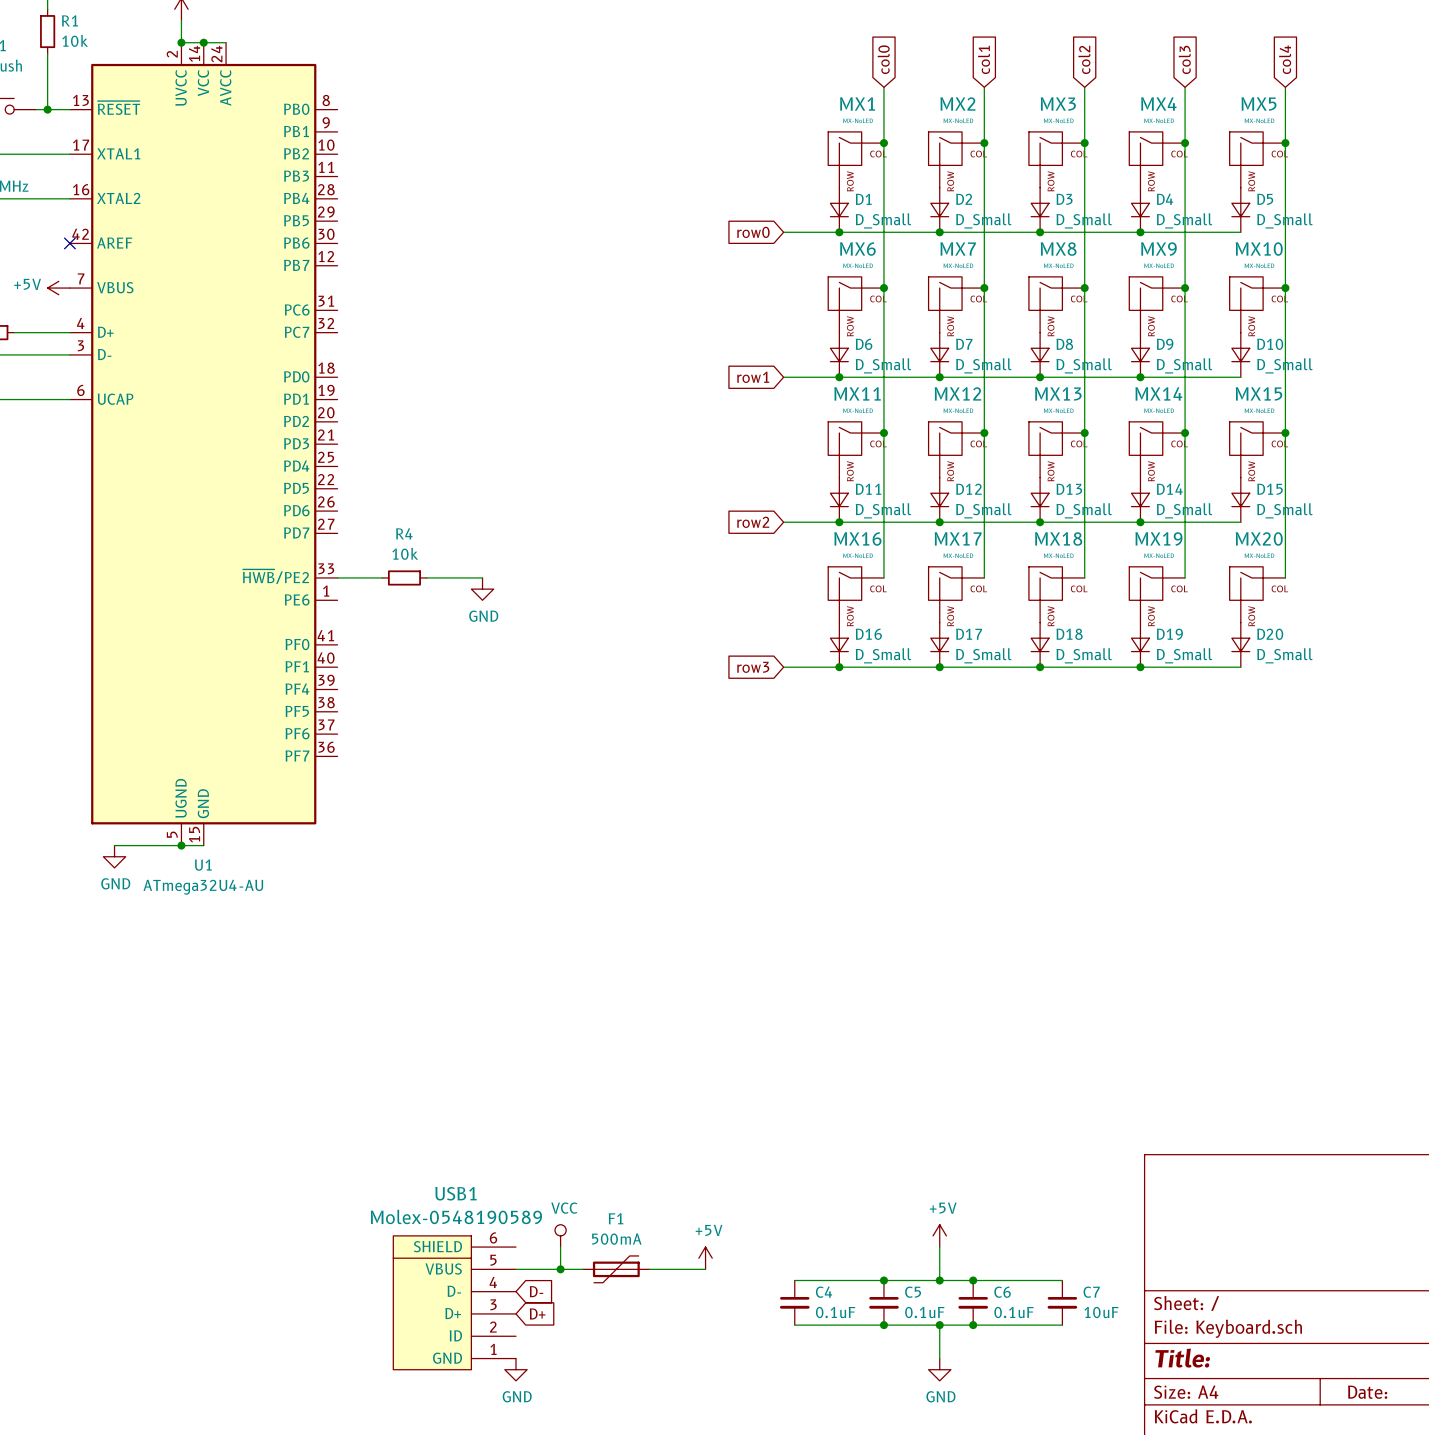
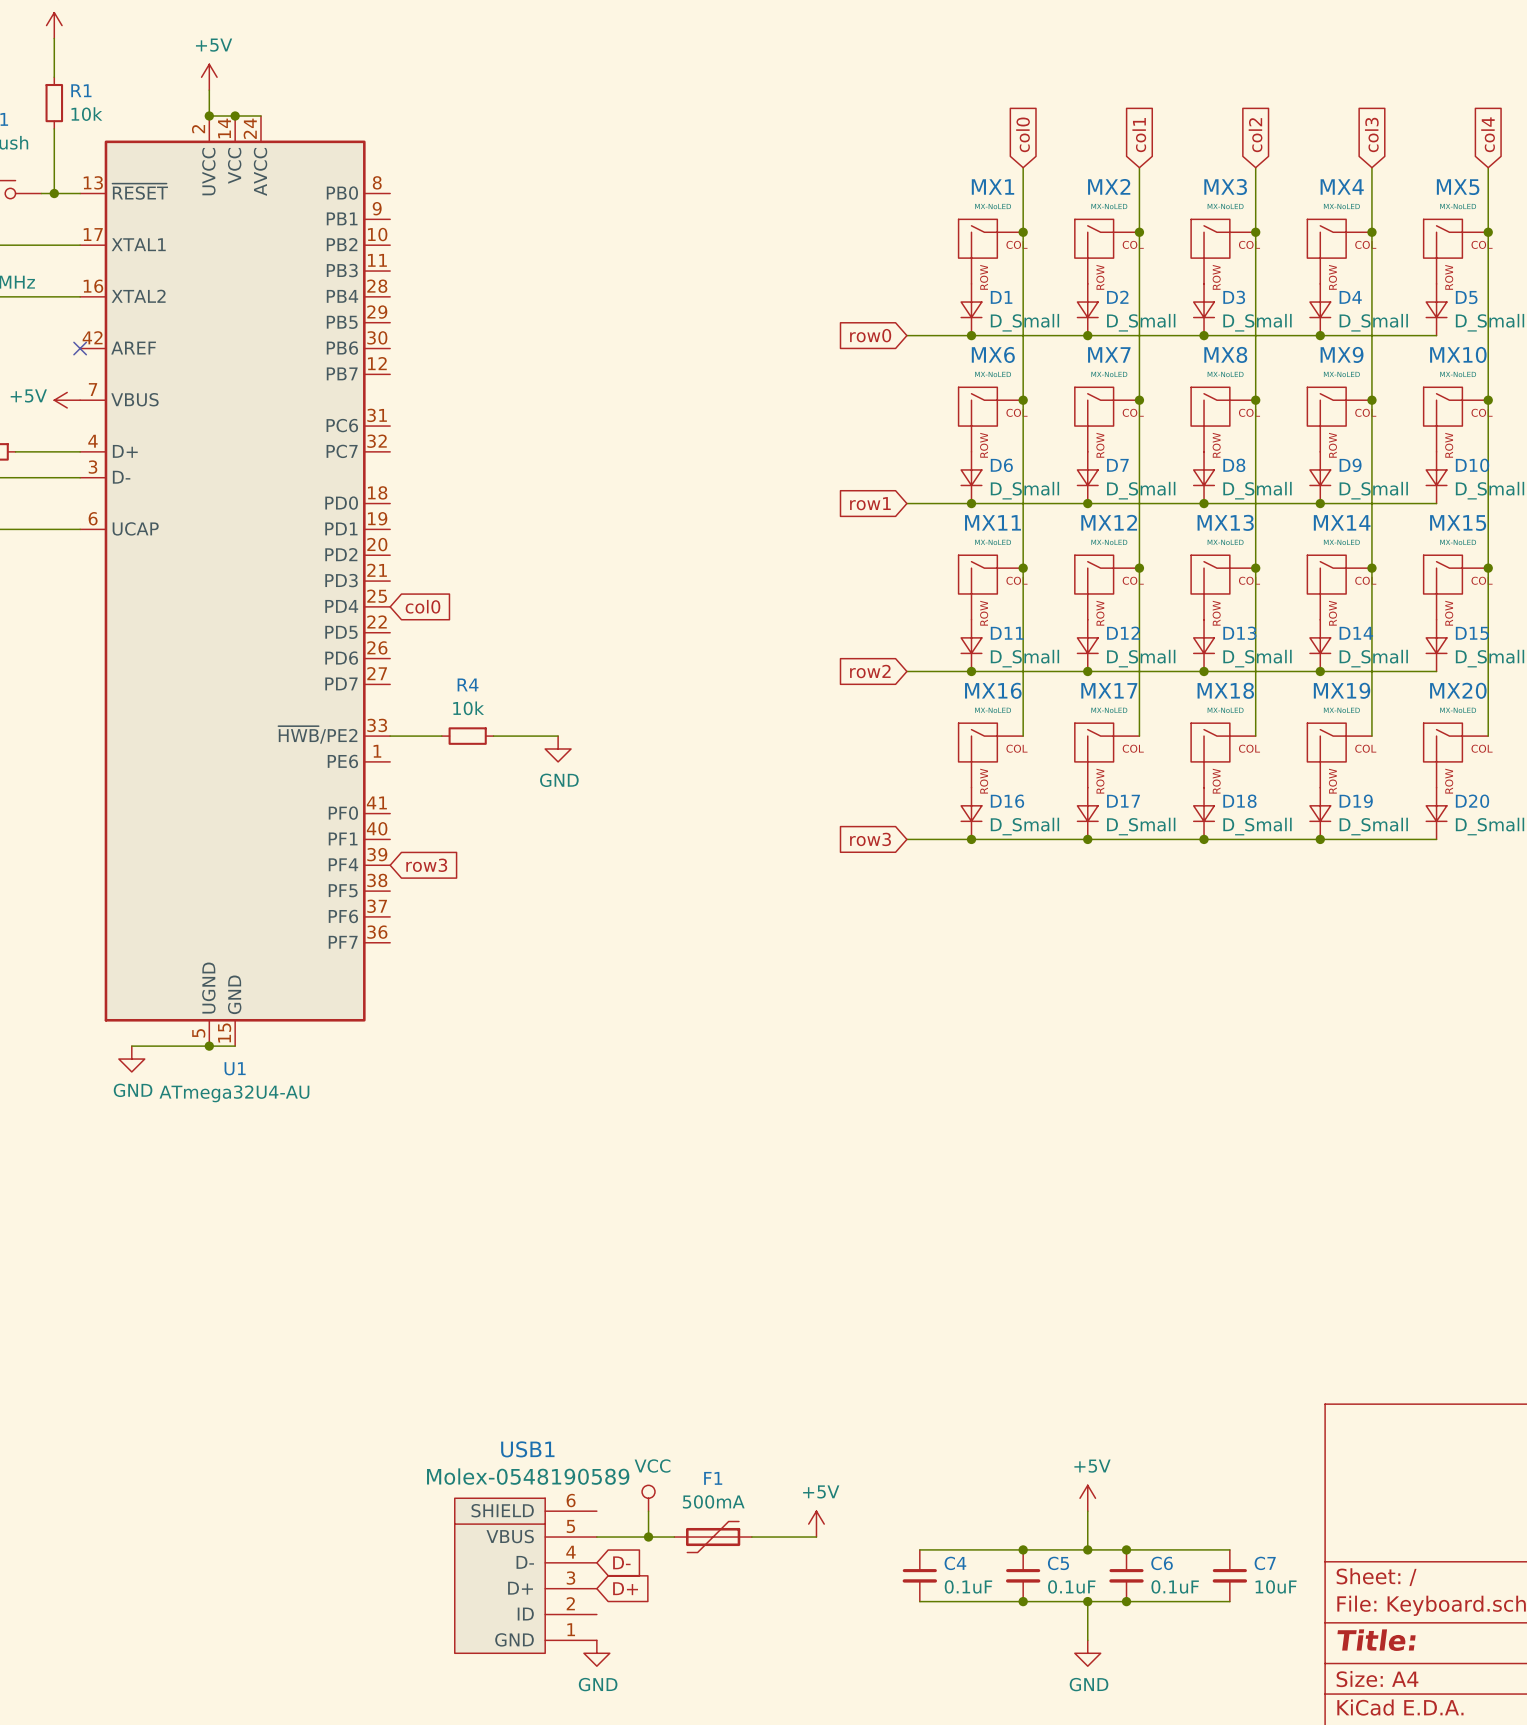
global label: none -> col0 (422, 606)
global label: none -> row3 (426, 865)

